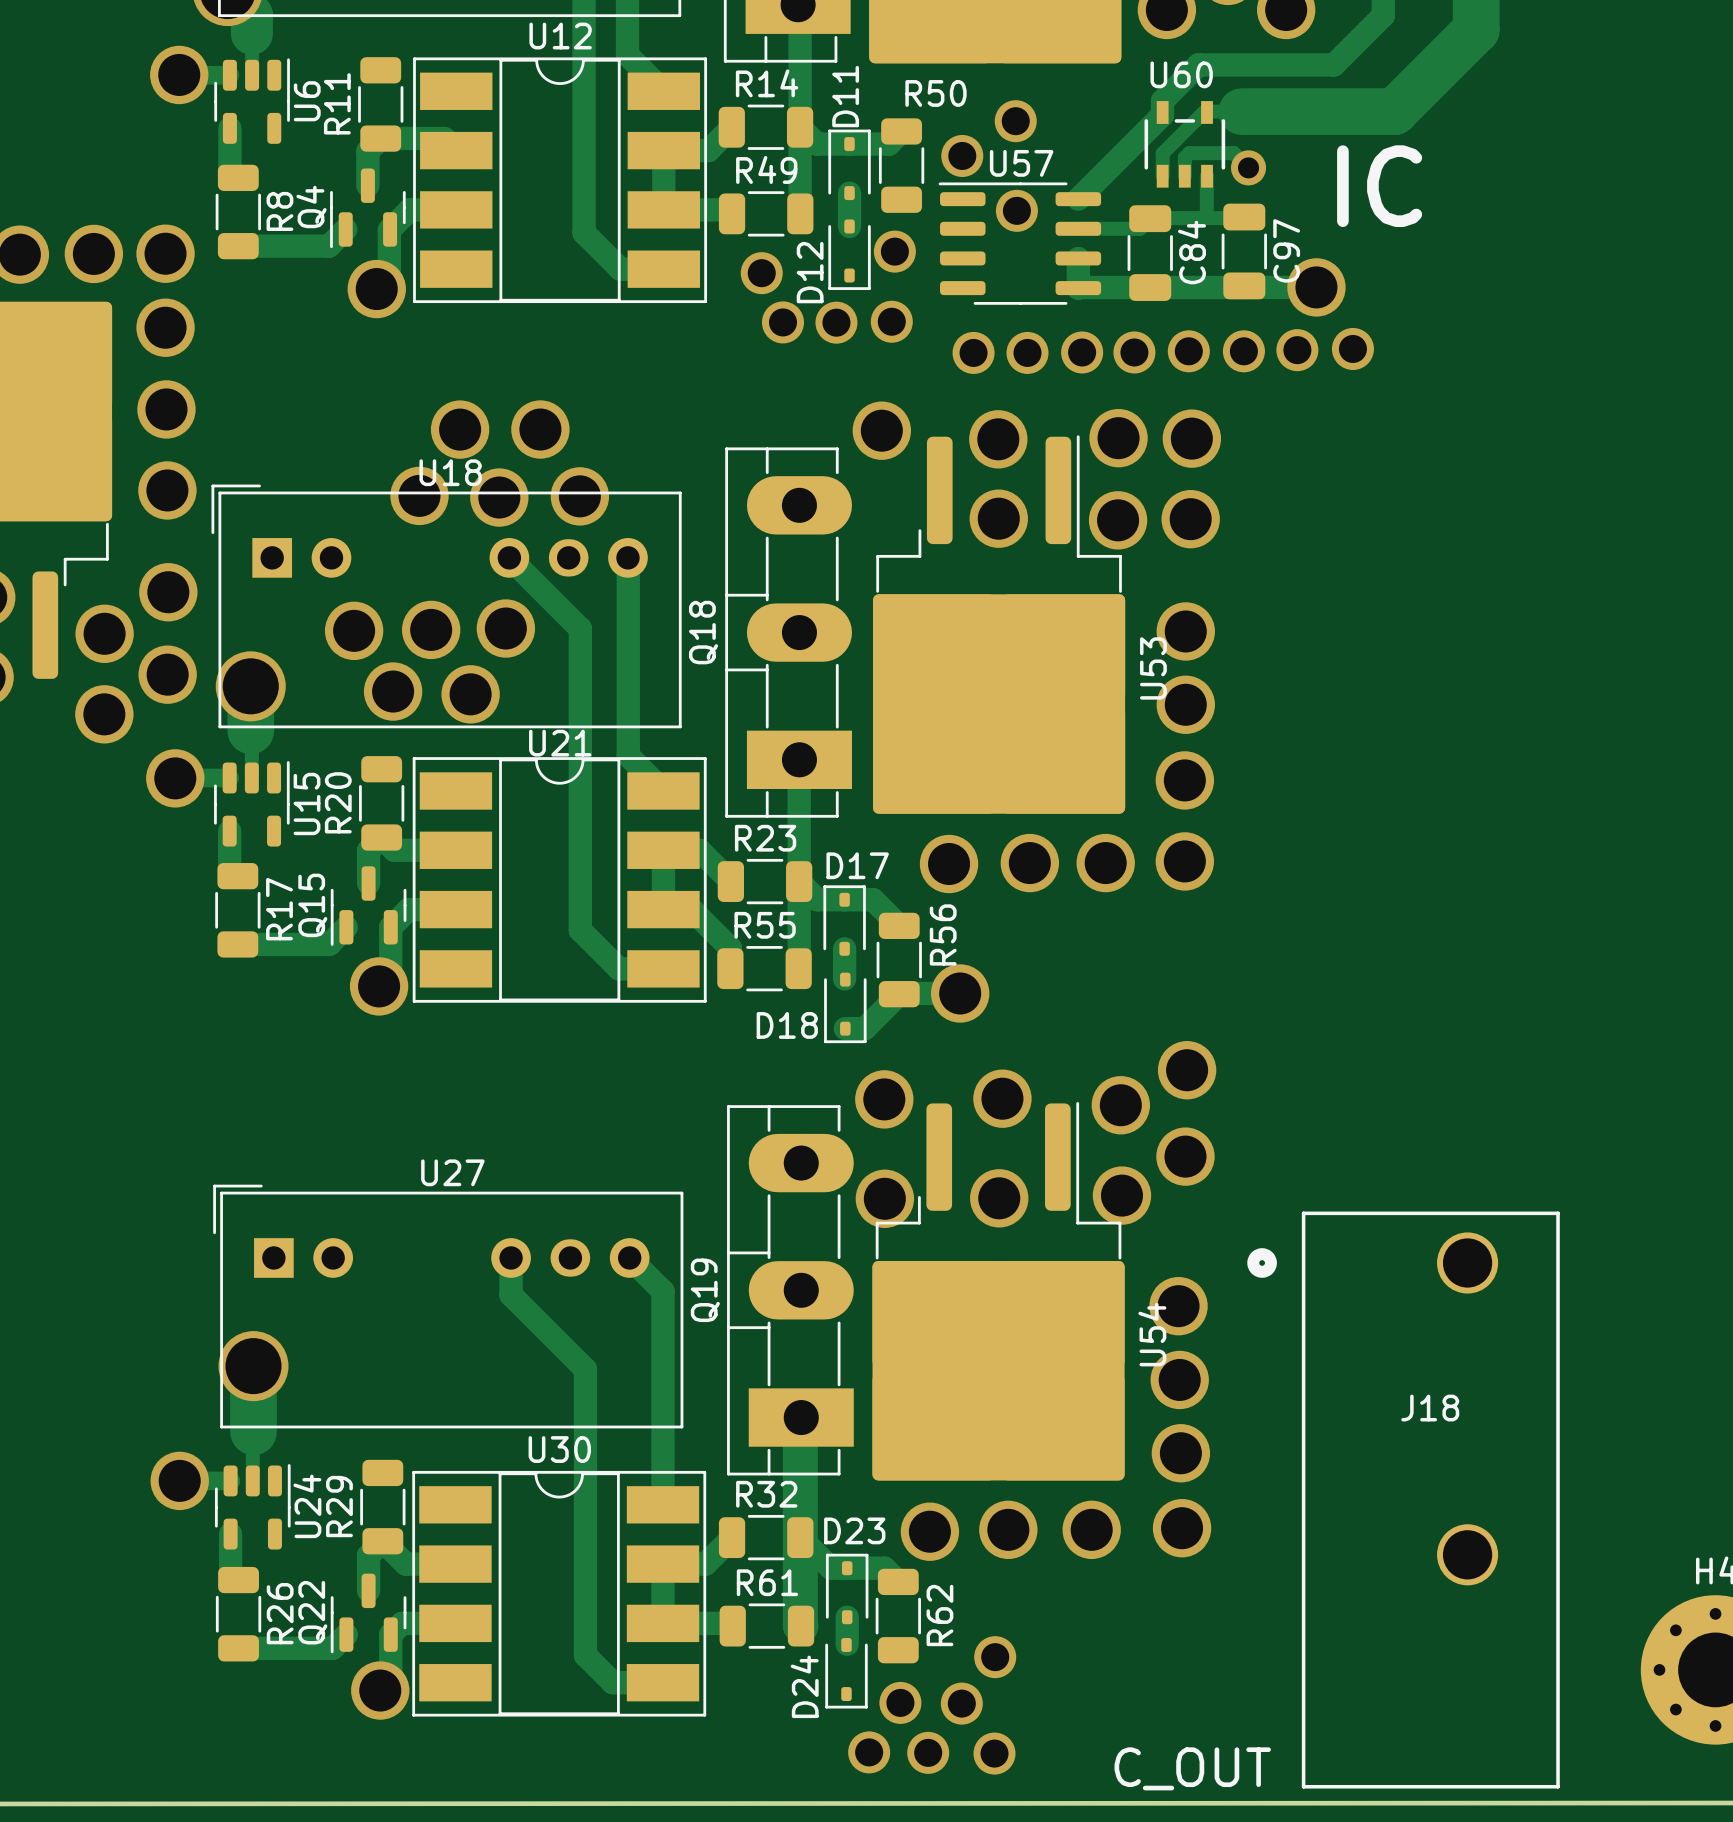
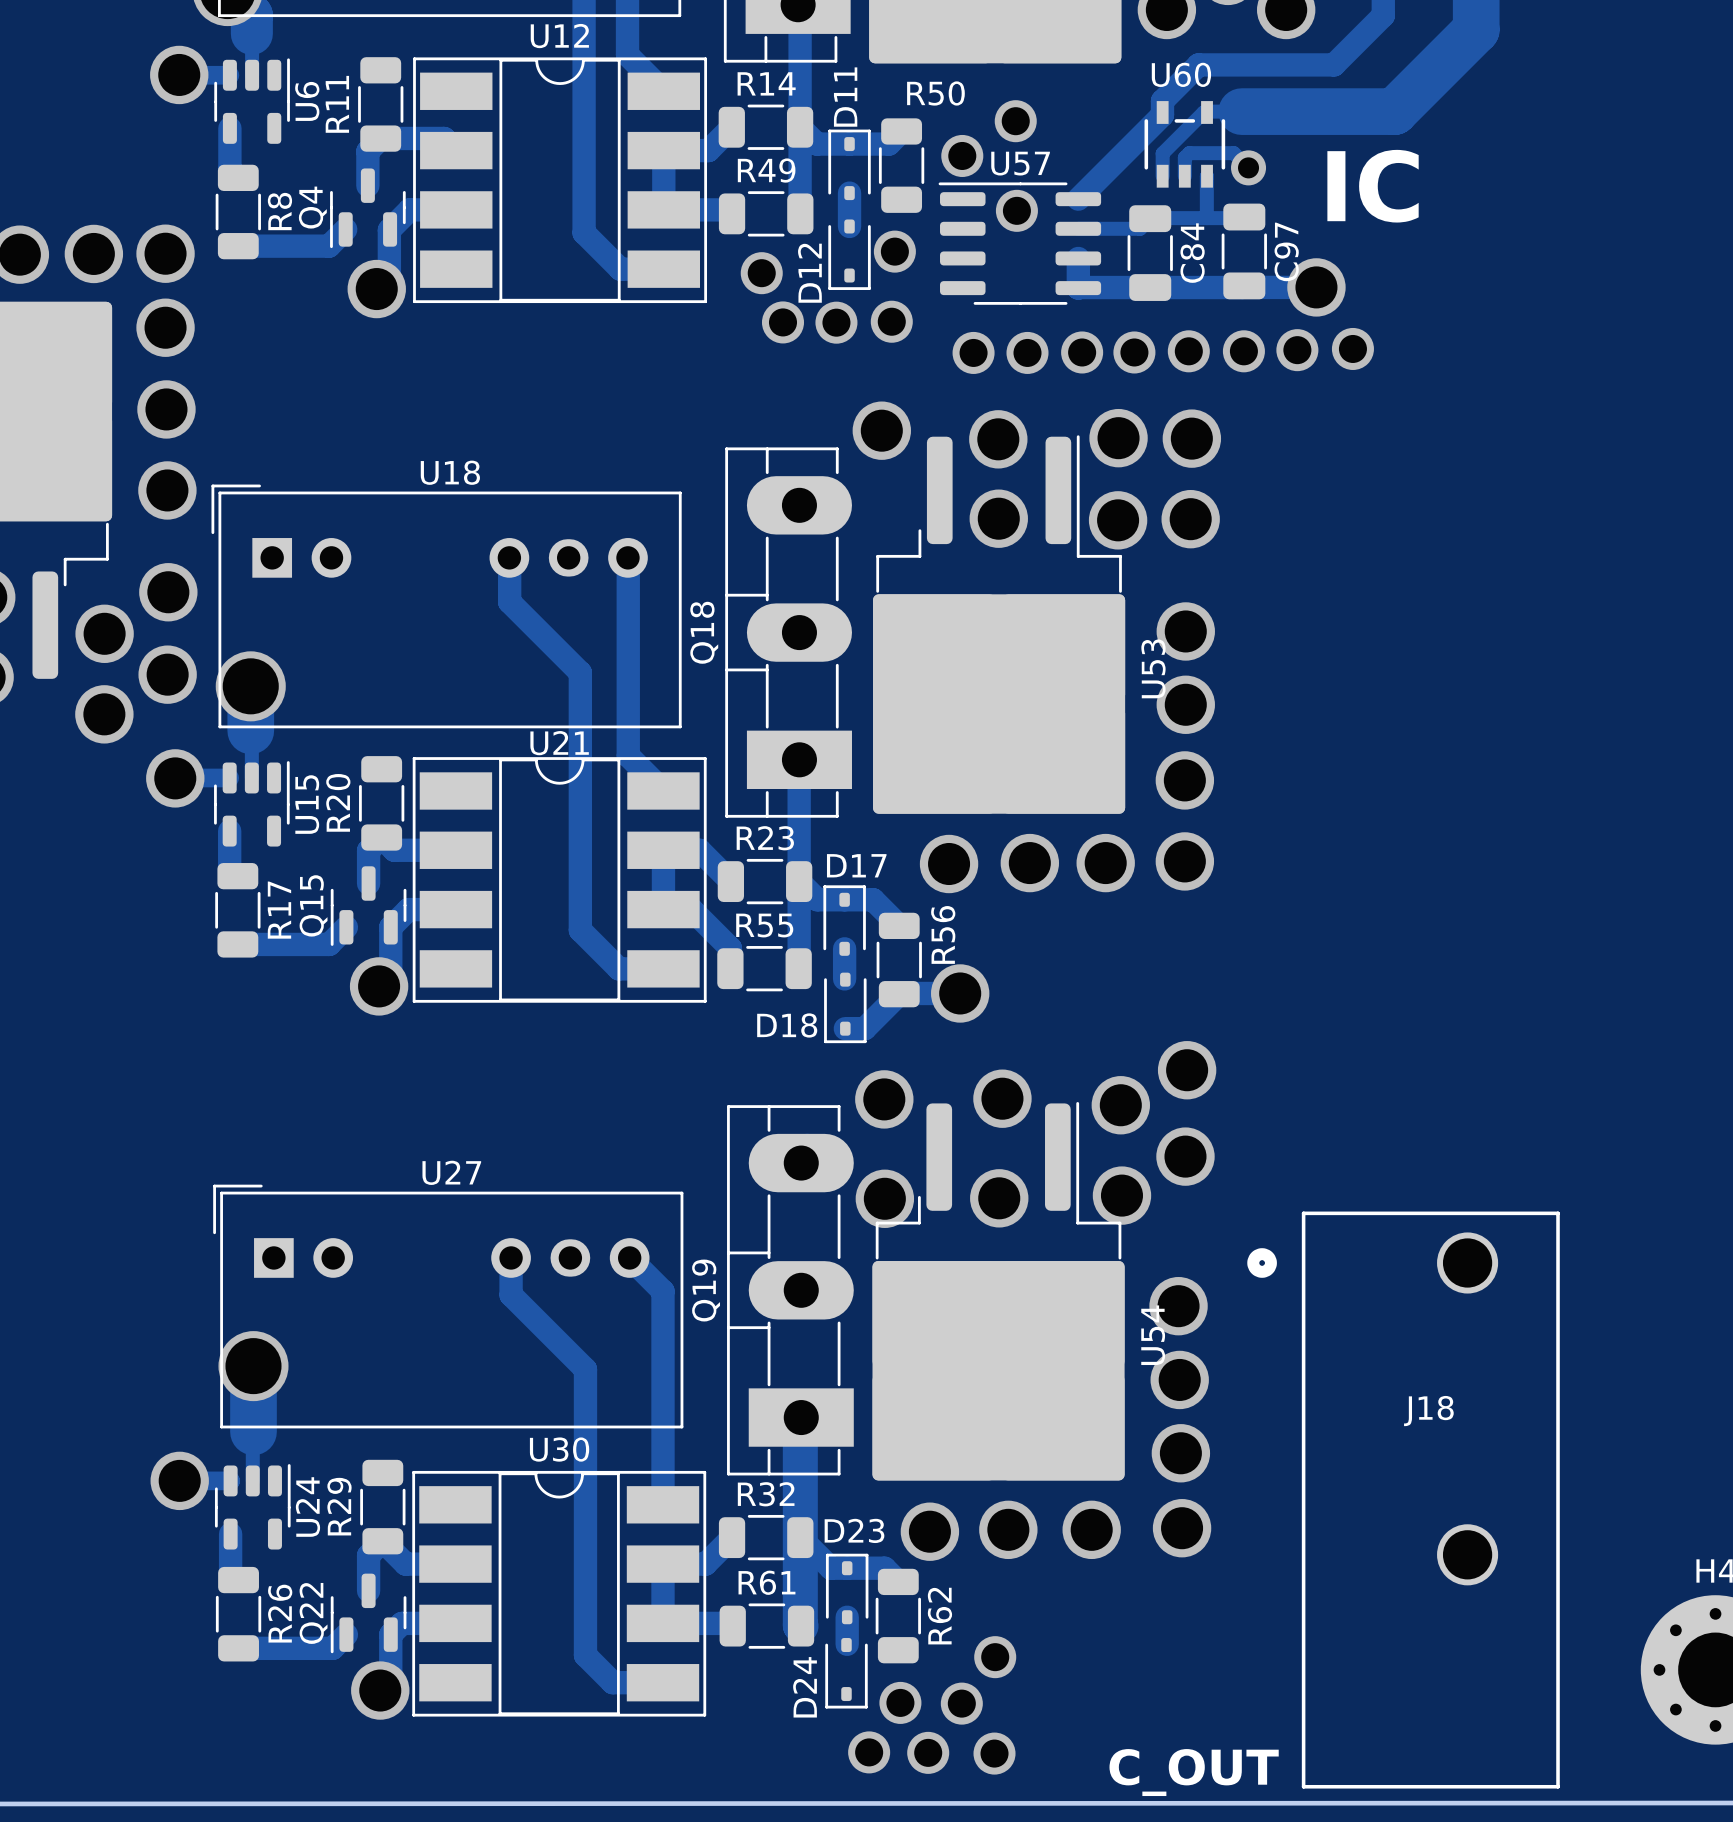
via: (460, 429) -> none
via: (540, 429) -> none
via: (419, 495) -> none
via: (579, 496) -> none
via: (499, 497) -> none
track: (509, 558) (580, 628) (580, 672) -> (509, 558) (509, 602) (580, 672)
via: (505, 628) -> none
via: (431, 629) -> none
via: (354, 630) -> none
via: (393, 691) -> none
via: (470, 694) -> none

